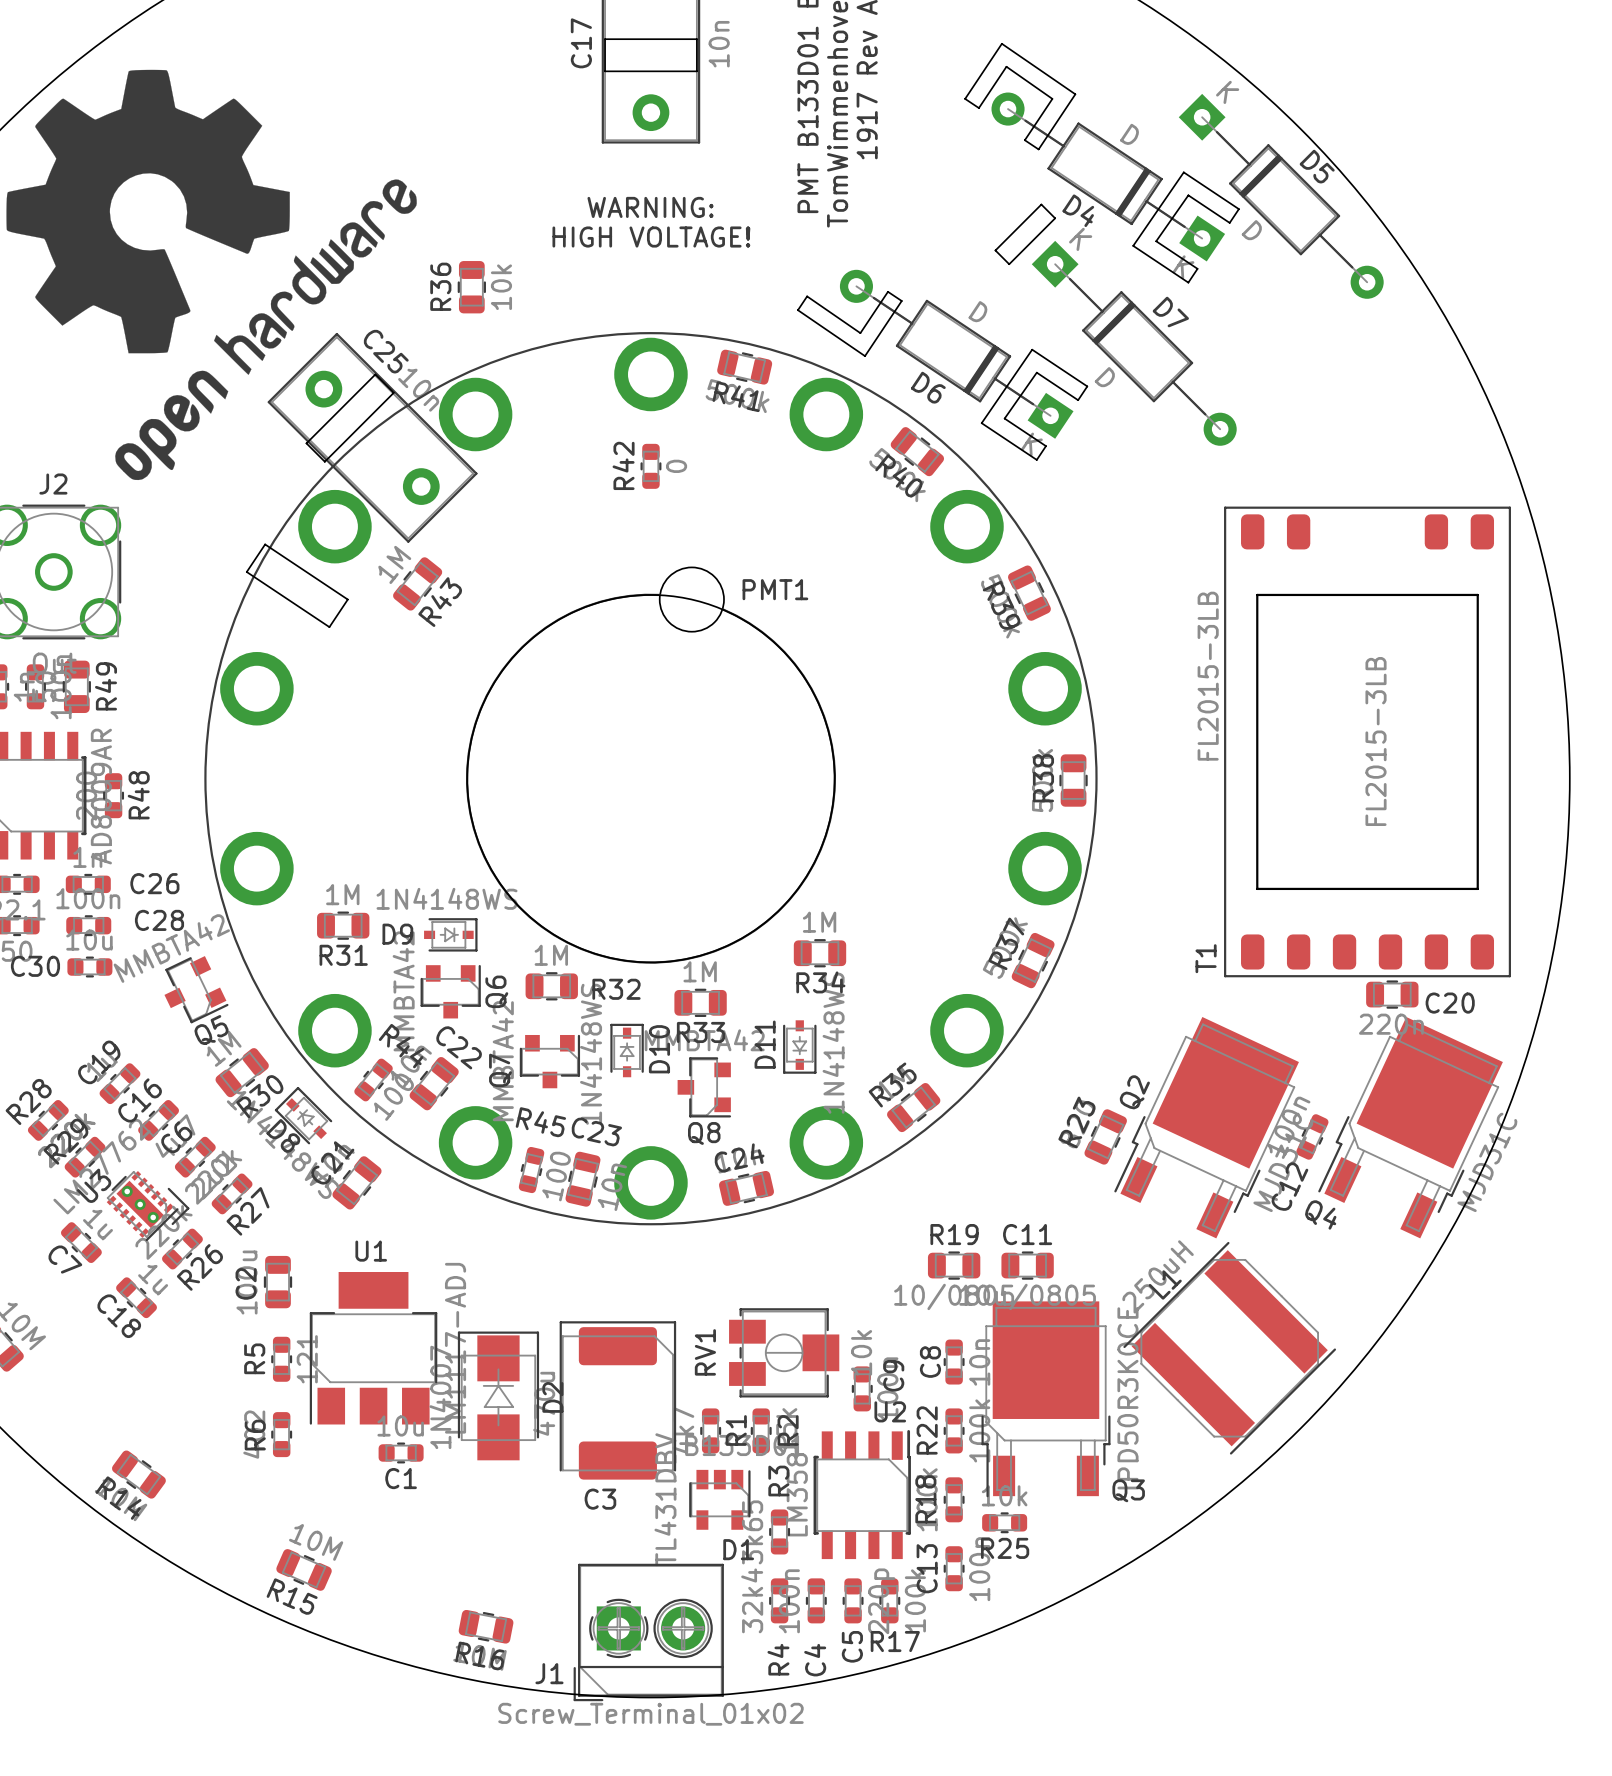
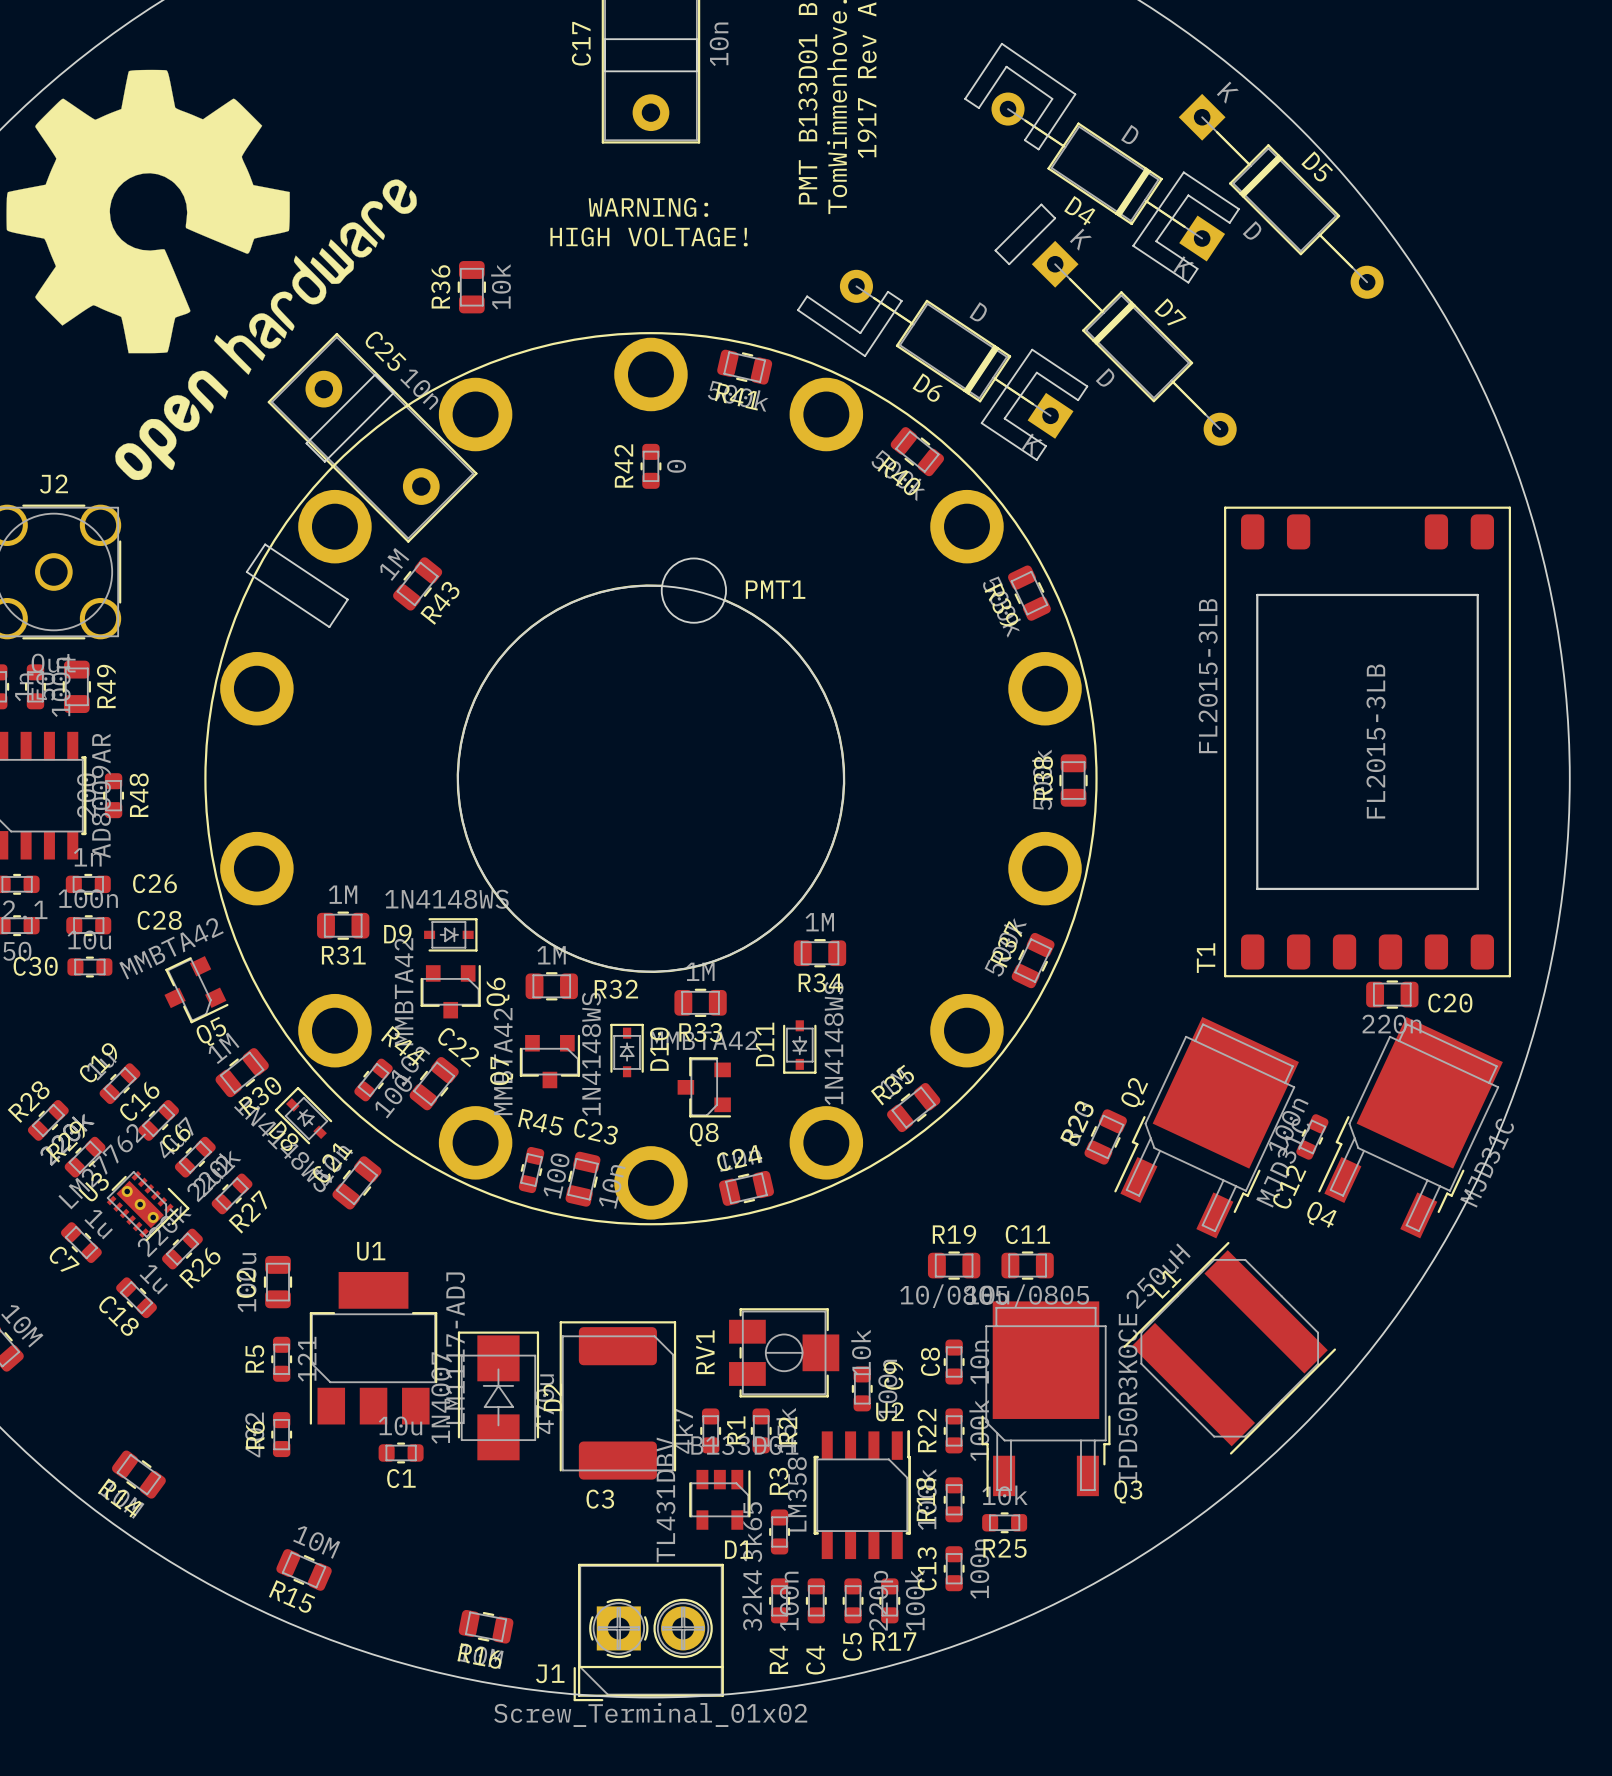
PMT1 footprint: [204, 332, 1098, 1226] -> [204, 332, 1098, 1226]
round board edge size: [466, 594, 836, 963] -> [457, 585, 845, 973]

